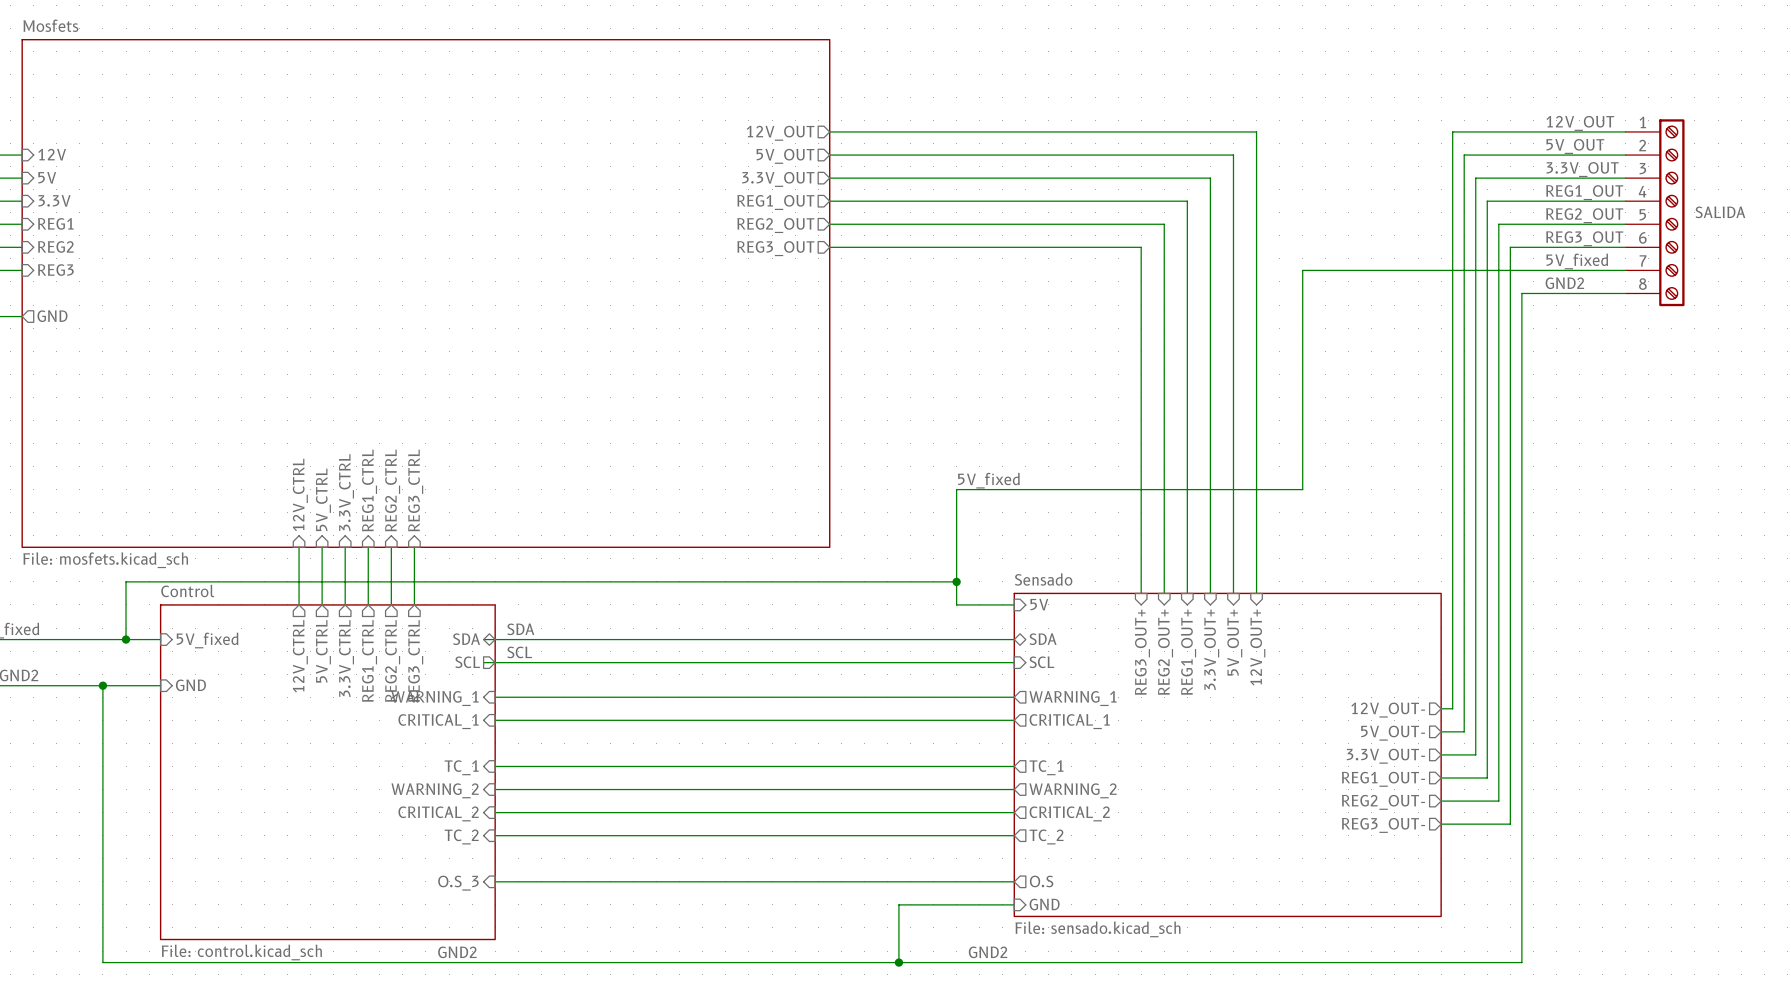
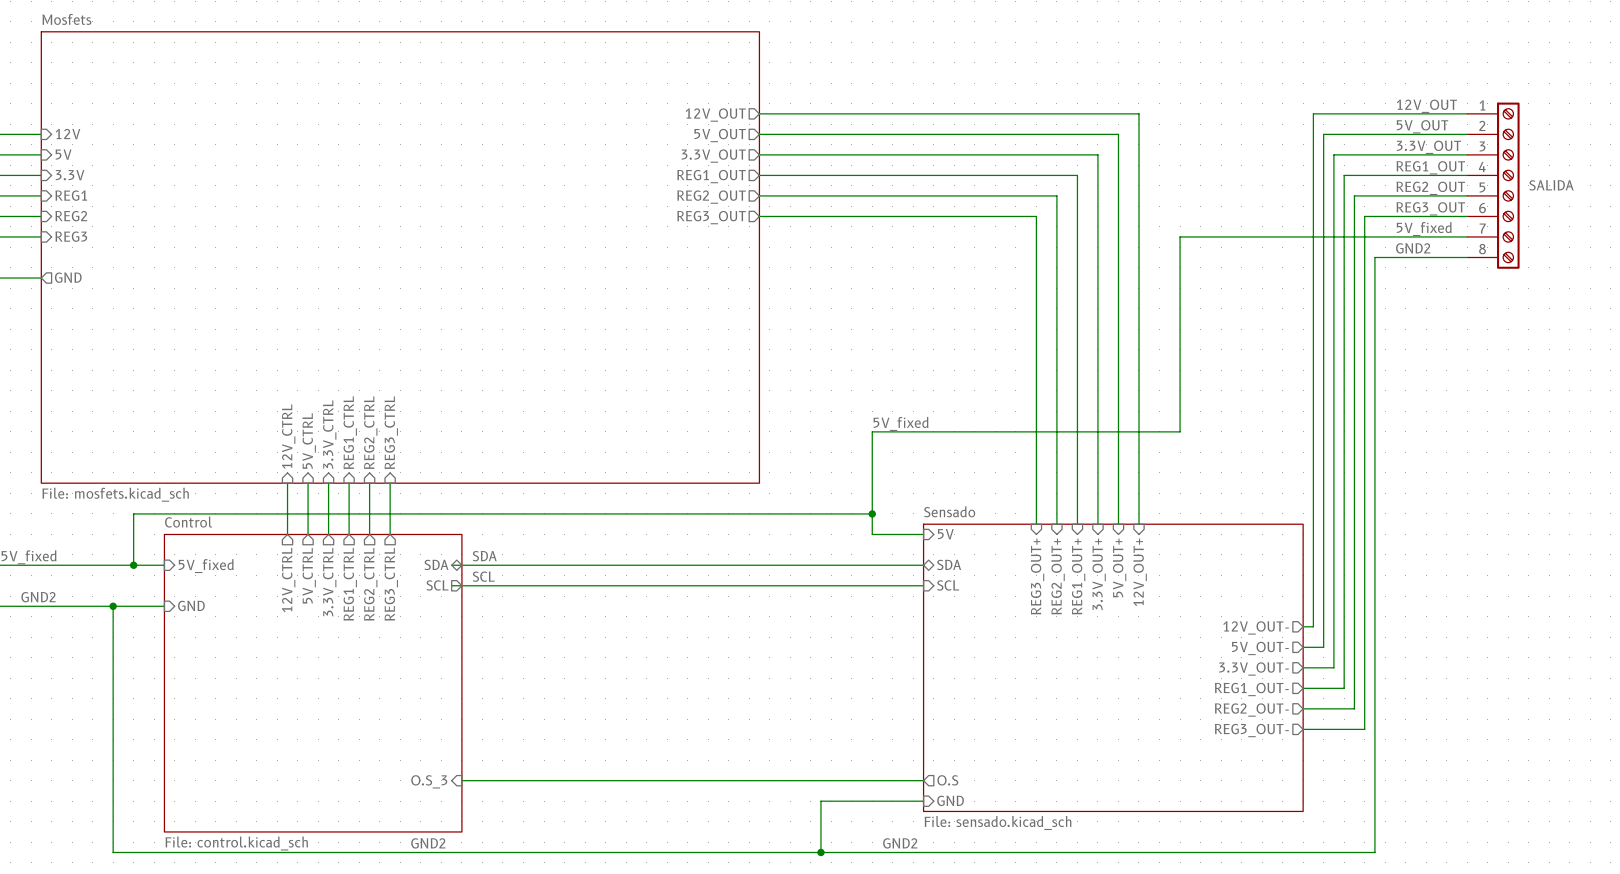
wire: (495, 697) (1014, 697) -> none
sheet pin: WARNING_1 (435, 698) -> none
sheet pin: WARNING_1 (1073, 698) -> none
wire: (495, 720) (1014, 720) -> none
sheet pin: CRITICAL_1 (438, 721) -> none
sheet pin: CRITICAL_1 (1069, 721) -> none
wire: (495, 766) (1014, 766) -> none
sheet pin: TC_1 (461, 767) -> none
sheet pin: TC_1 (1046, 767) -> none
wire: (495, 789) (1014, 789) -> none
sheet pin: WARNING_2 (435, 790) -> none
sheet pin: WARNING_2 (1073, 790) -> none
wire: (495, 812) (1014, 812) -> none
sheet pin: CRITICAL_2 (438, 813) -> none
sheet pin: CRITICAL_2 (1069, 813) -> none
wire: (495, 835) (1014, 835) -> none
sheet pin: TC_2 (461, 836) -> none
sheet pin: TC_2 (1046, 836) -> none

